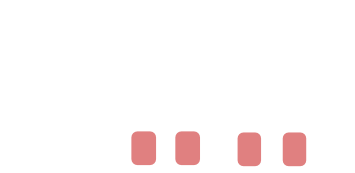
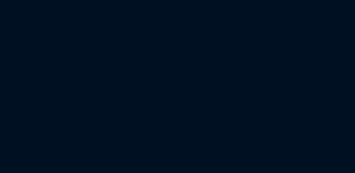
part: (165, 148) -> none
part: (271, 149) -> none

